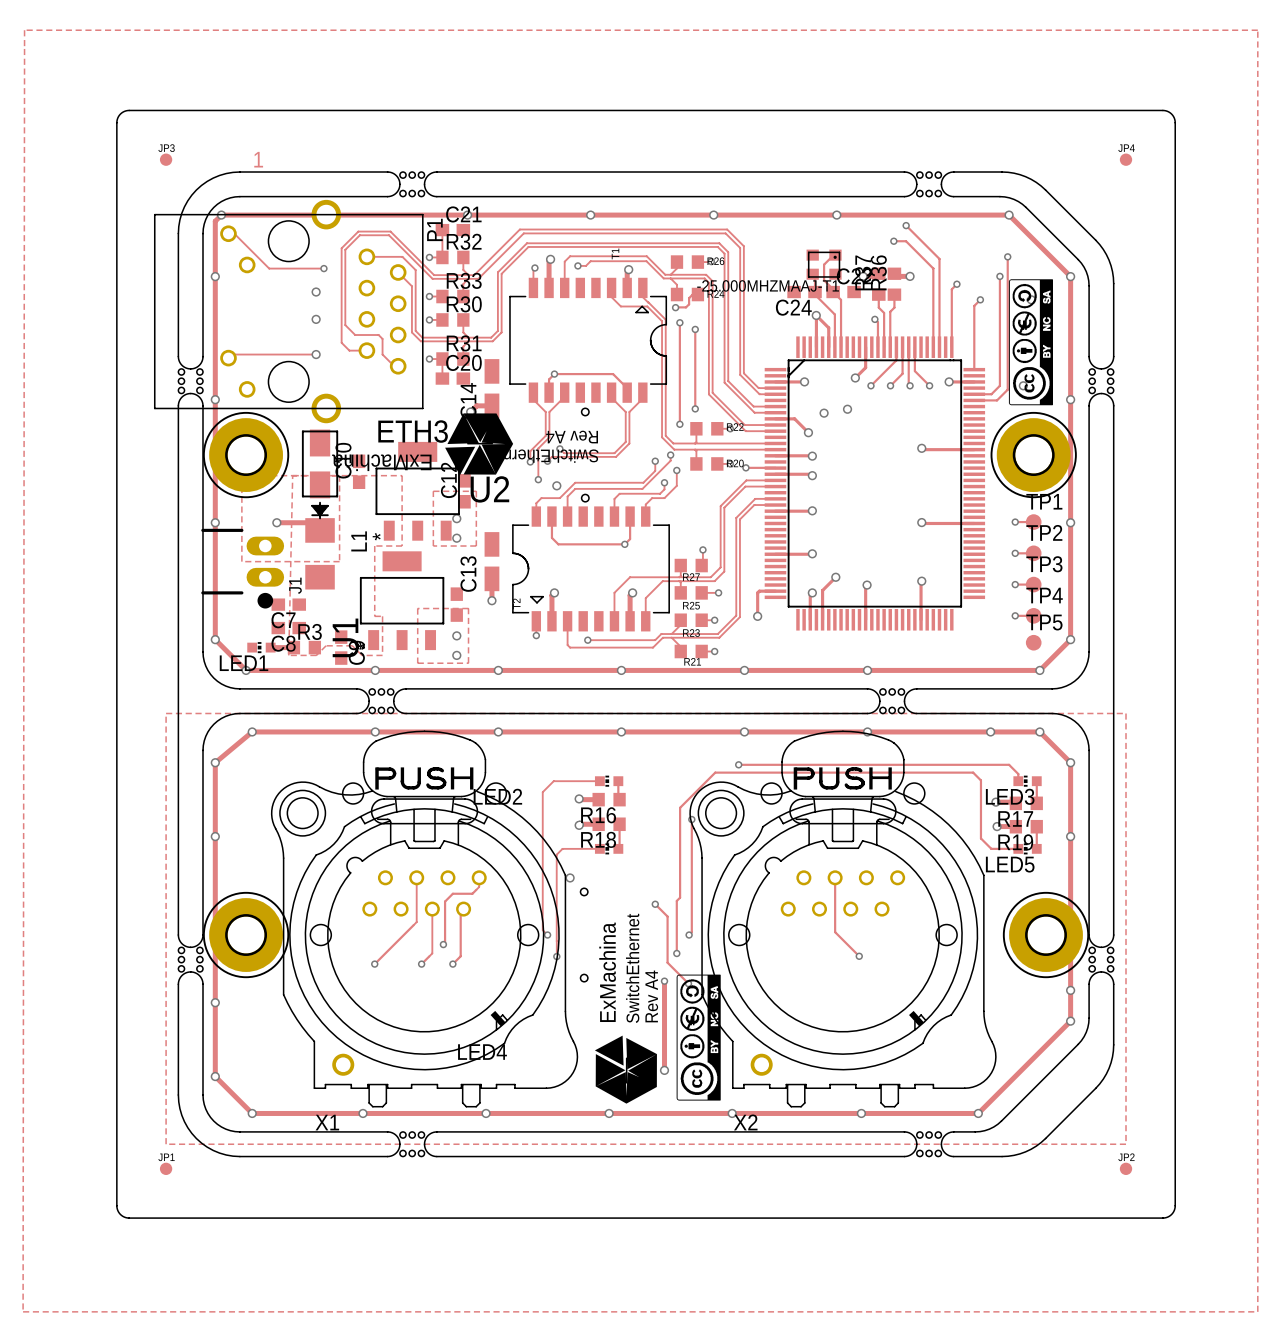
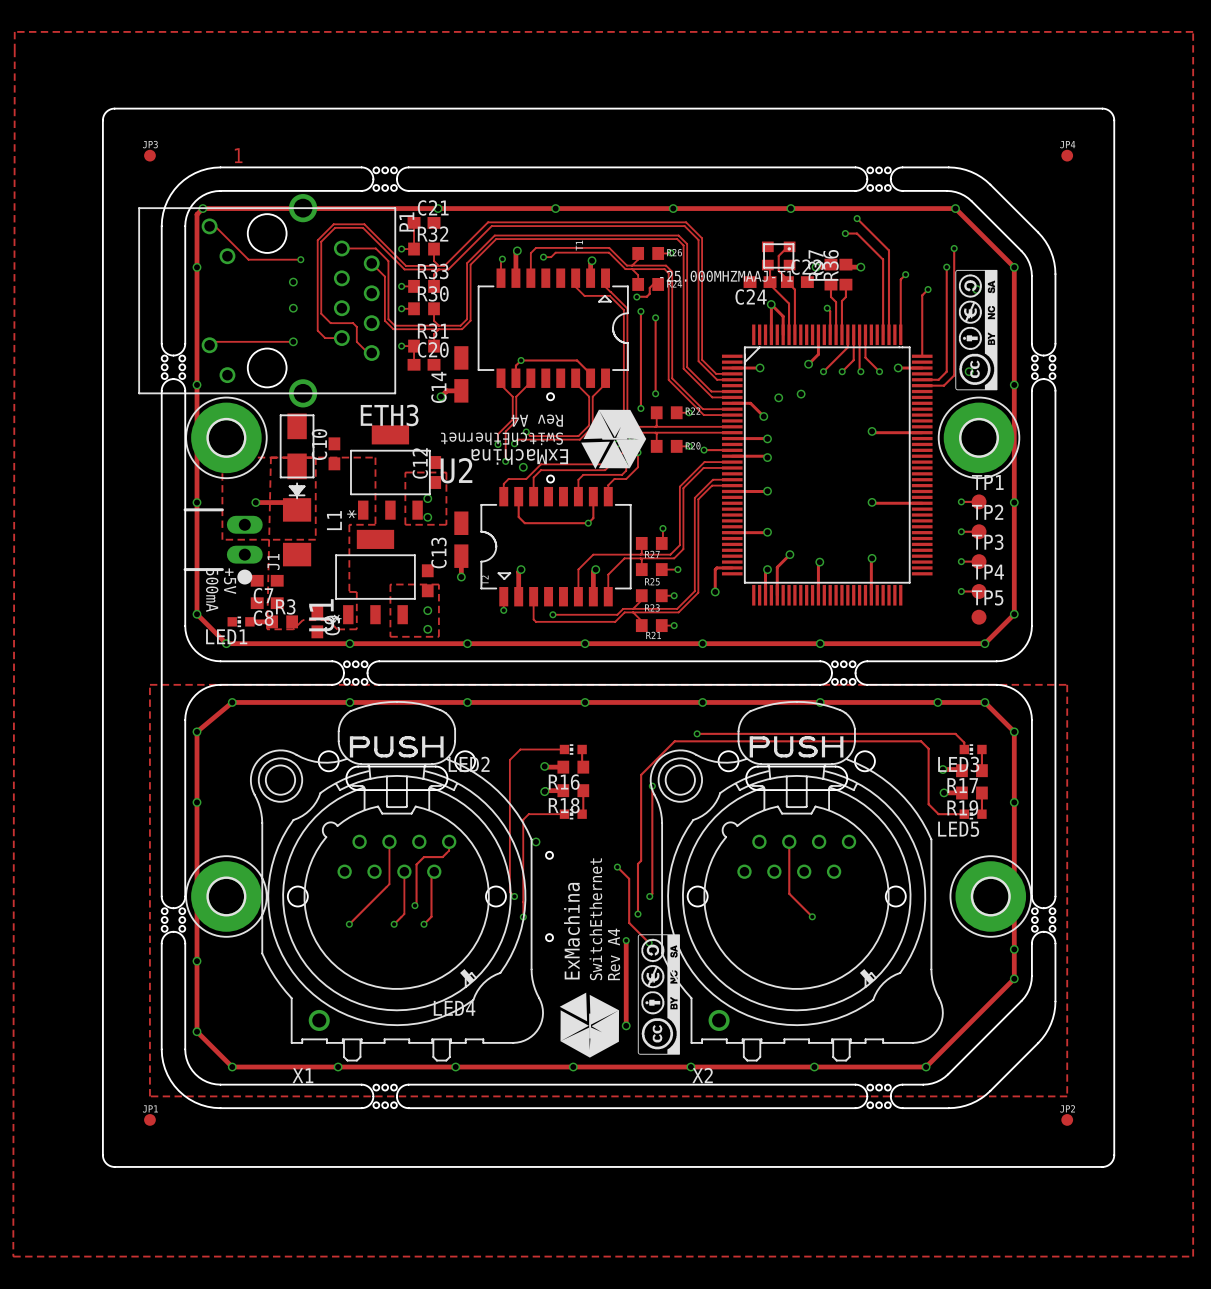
drawing position: (479, 444) -> (613, 439)
text: none -> +5V (230, 581)
text: none -> 500mA (212, 590)

